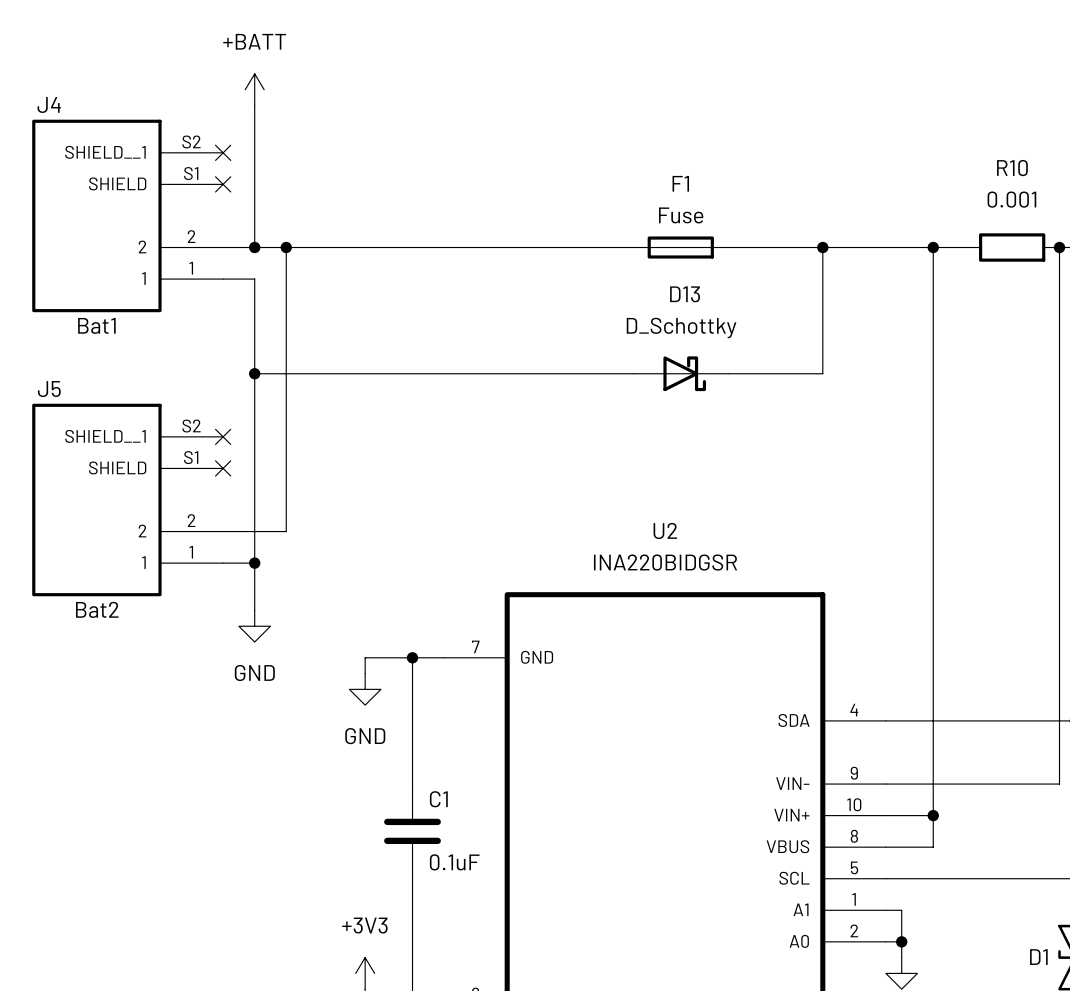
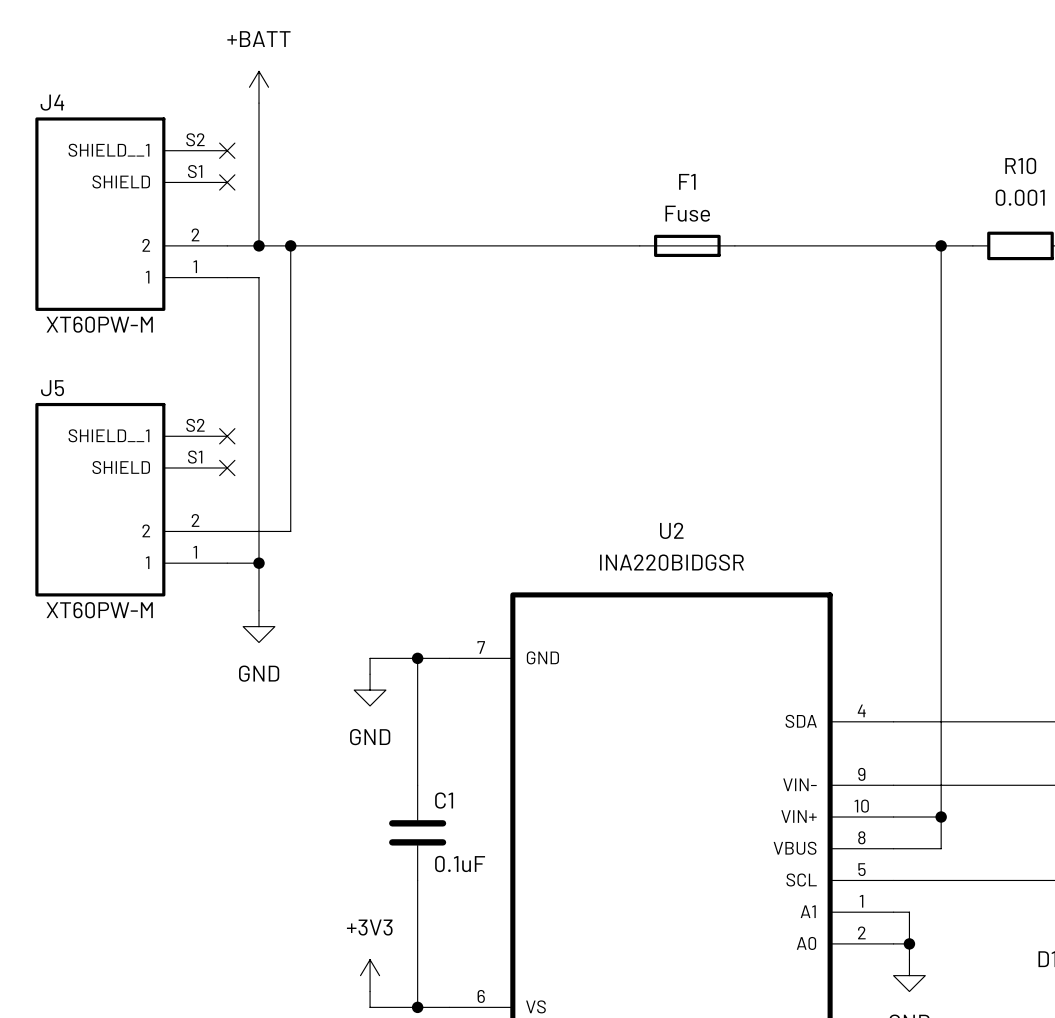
wire: (822, 247) (822, 373) (728, 373) -> none
junction: (822, 247) -> none
J4 value: Bat1 (96, 325) -> XT60PW-M (99, 324)
wire: (254, 373) (633, 373) -> none
junction: (254, 373) -> none
D13: D_Schottky (680, 373) -> none
J5 value: Bat2 (97, 609) -> XT60PW-M (99, 610)

